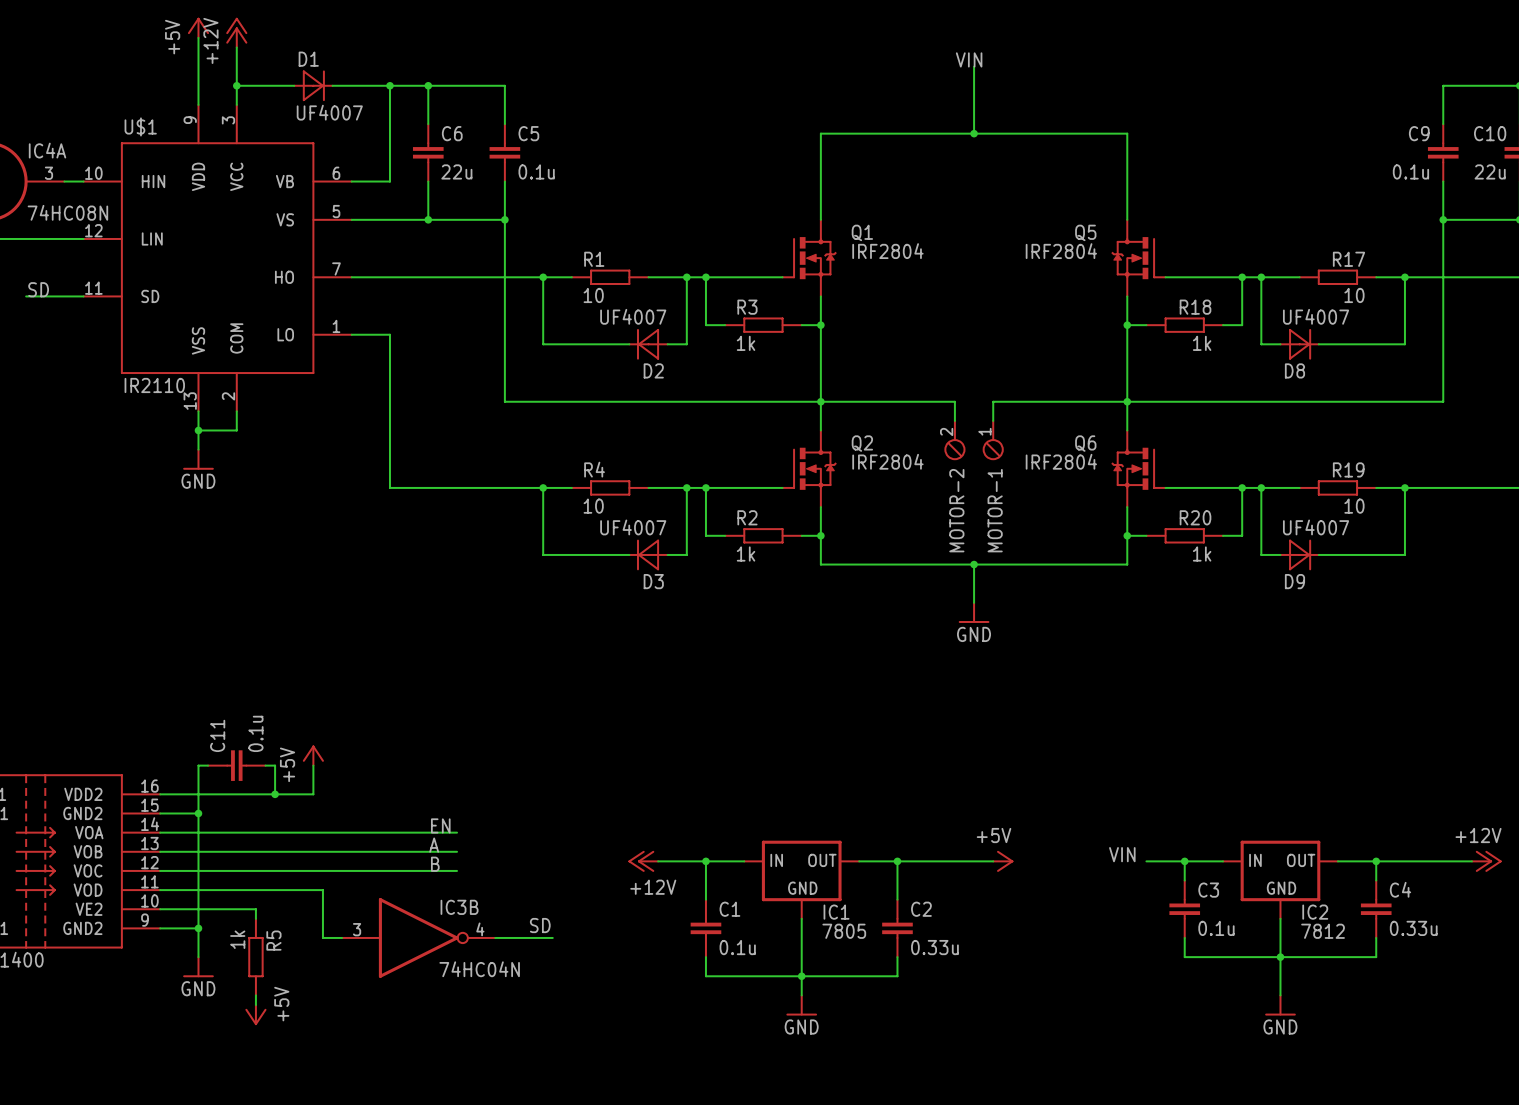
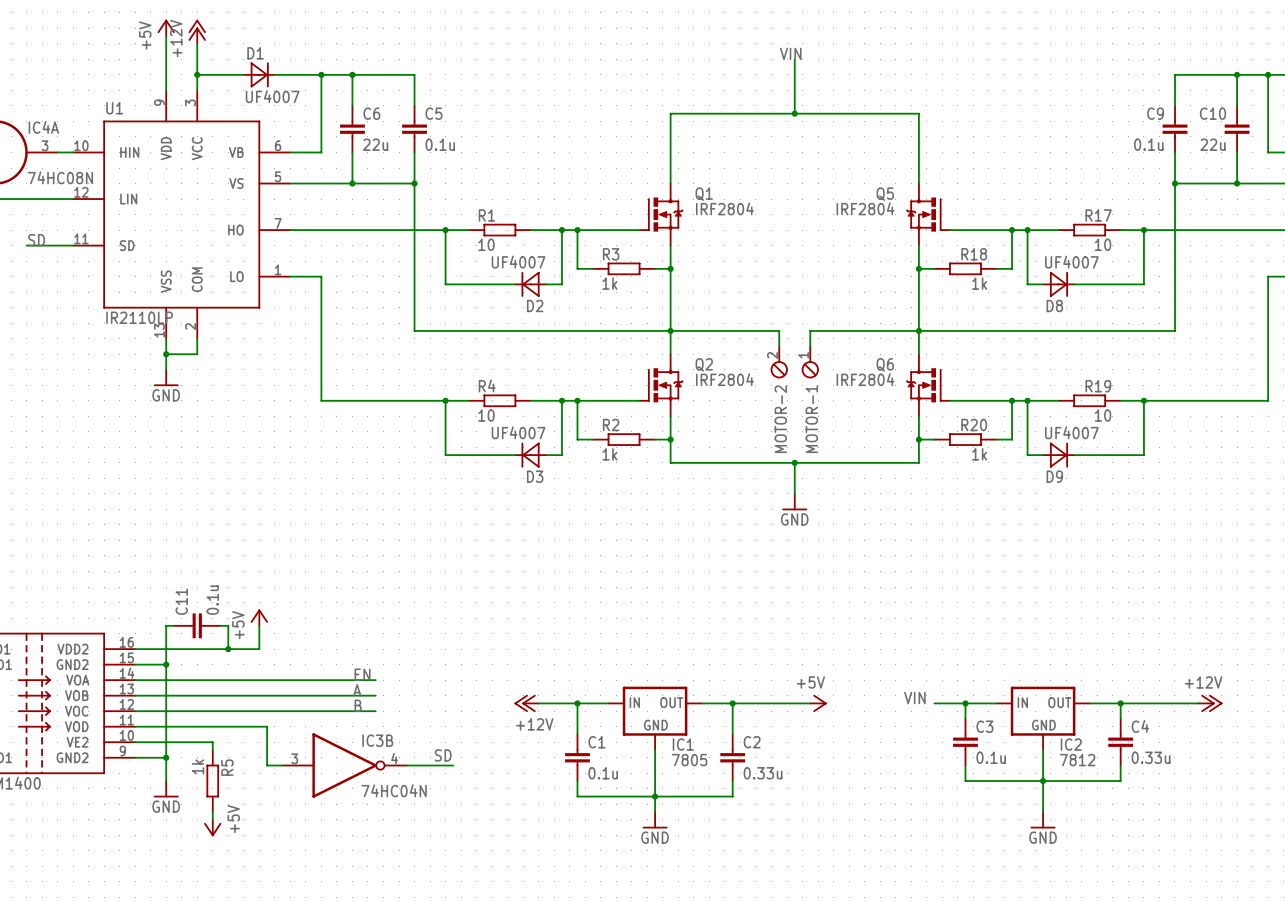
U$1 name: U$1 (140, 126) -> U1 (114, 108)
U$1 value: IR2110 (154, 385) -> IR2110LP (139, 317)

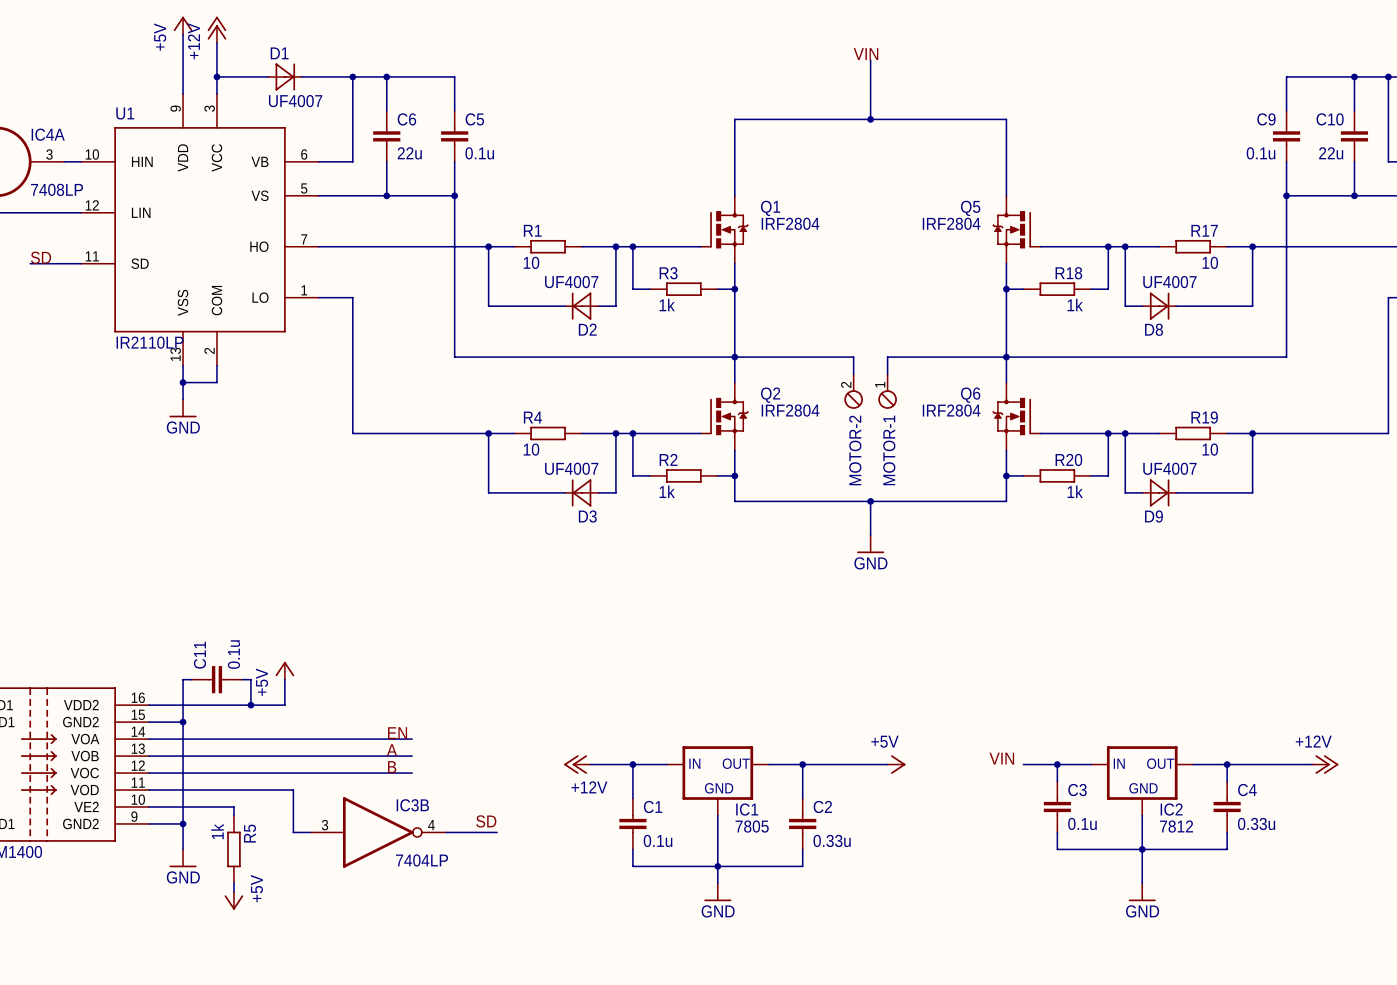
IC4A value: 74HC08N (60, 177) -> 7408LP (57, 189)
IC3B value: 74HC04N (394, 790) -> 7404LP (422, 860)

